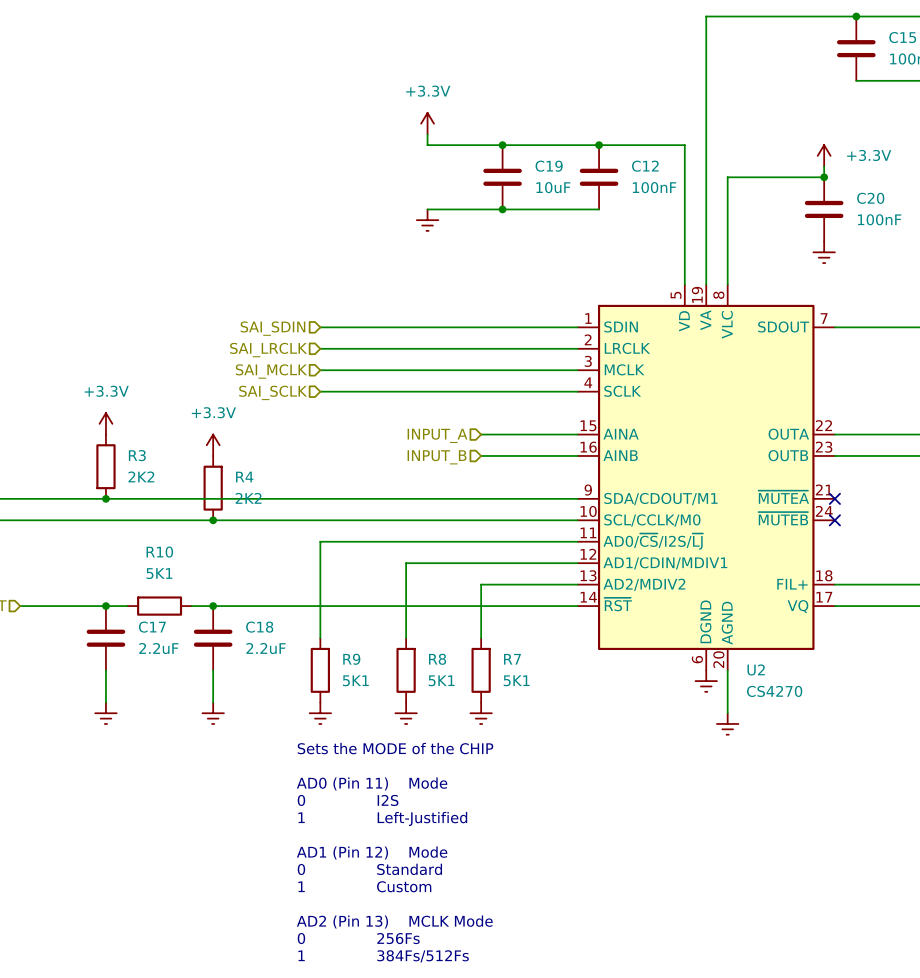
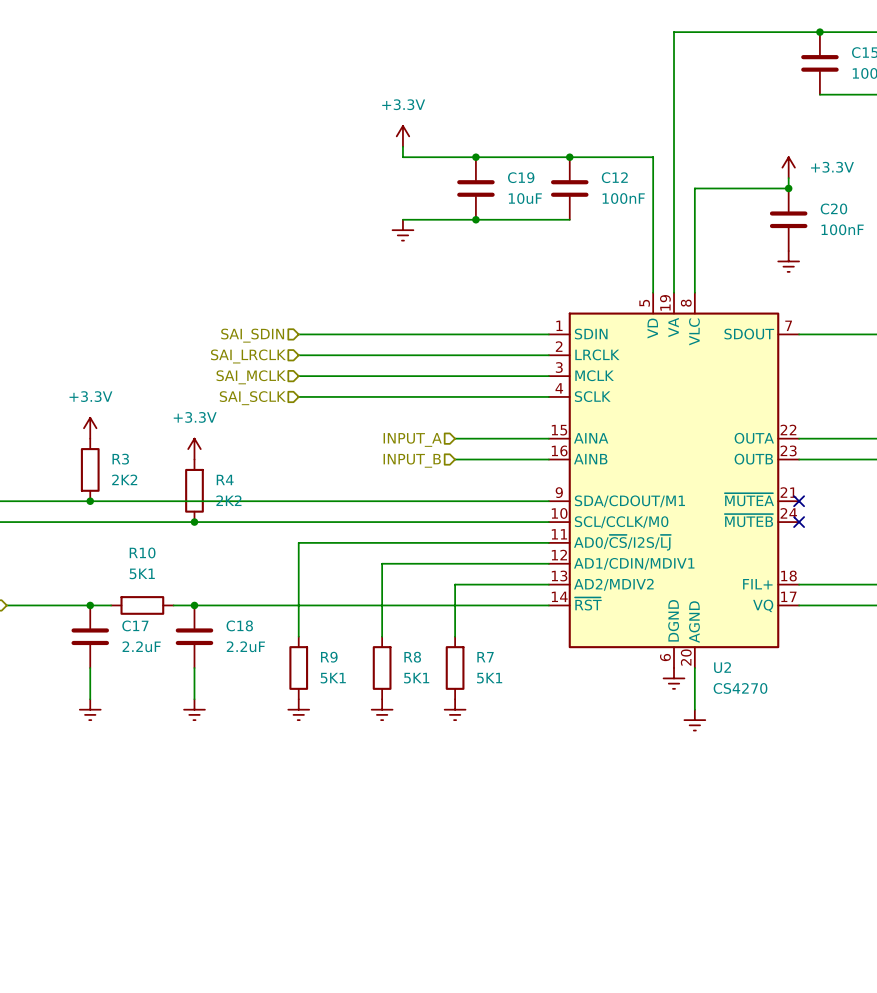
text: Sets the MODE of the CHIP (395, 748) -> none
text: AD0 (Pin 11) Mode (372, 783) -> none
text: 0 I2S (348, 800) -> none
text: 1 Left-Justified (382, 818) -> none
text: AD1 (Pin 12) Mode (372, 852) -> none
text: 0 Standard (369, 869) -> none
text: 1 Custom (364, 886) -> none
text: AD2 (Pin 13) MCLK Mode (394, 922) -> none
text: 0 256Fs (358, 938) -> none
text: 1 384Fs/512Fs (383, 956) -> none

